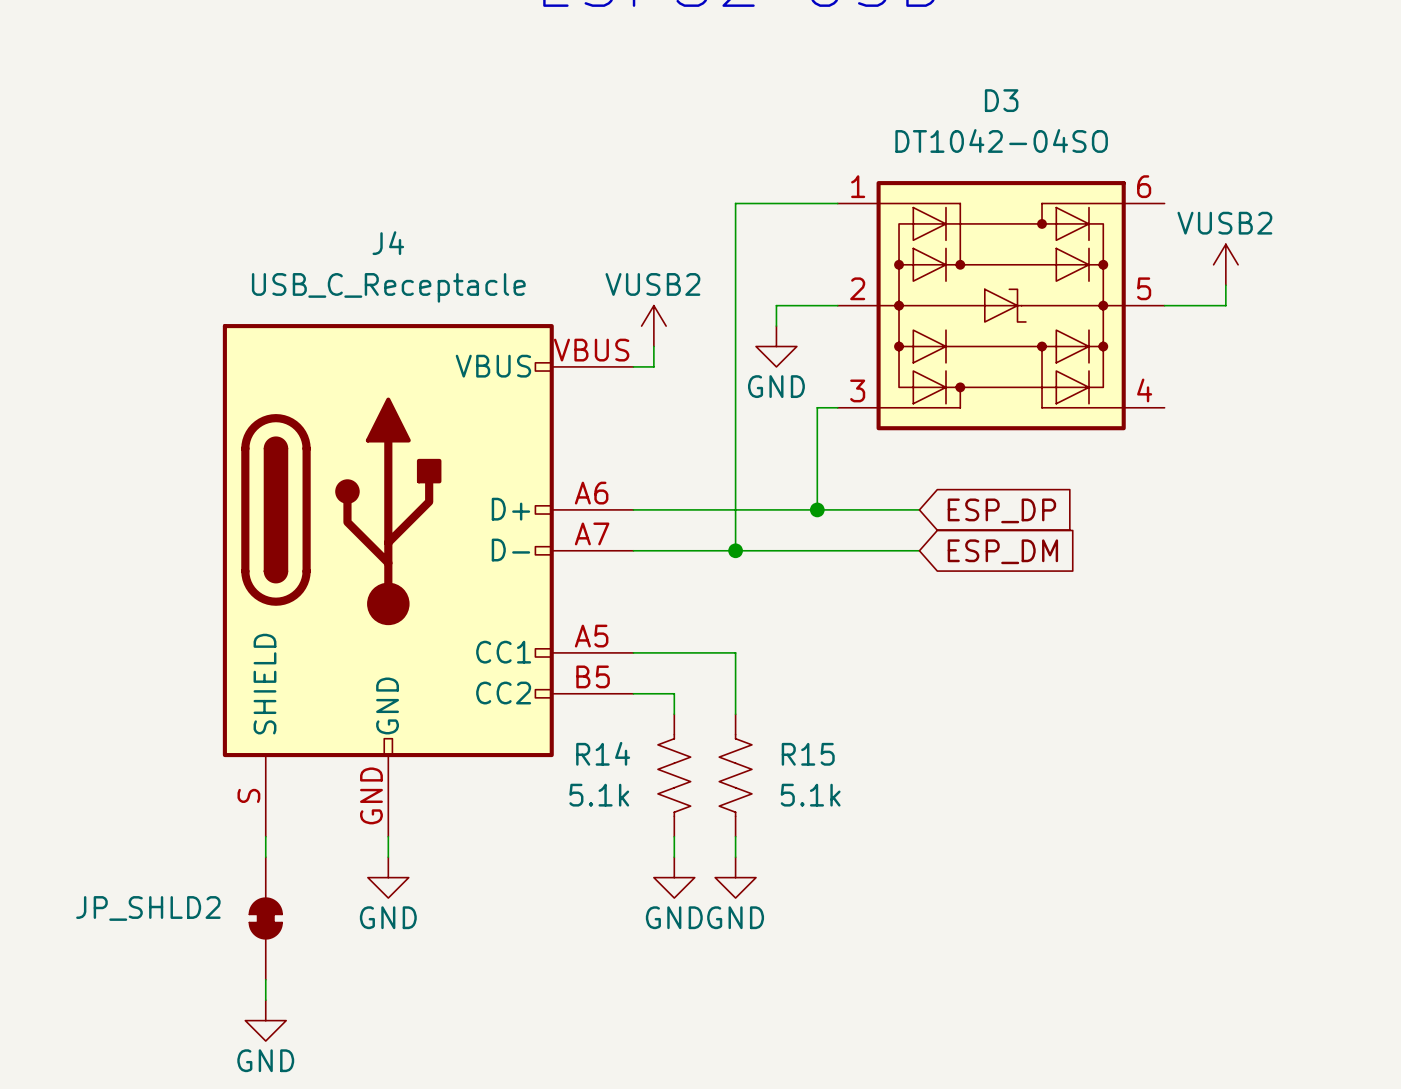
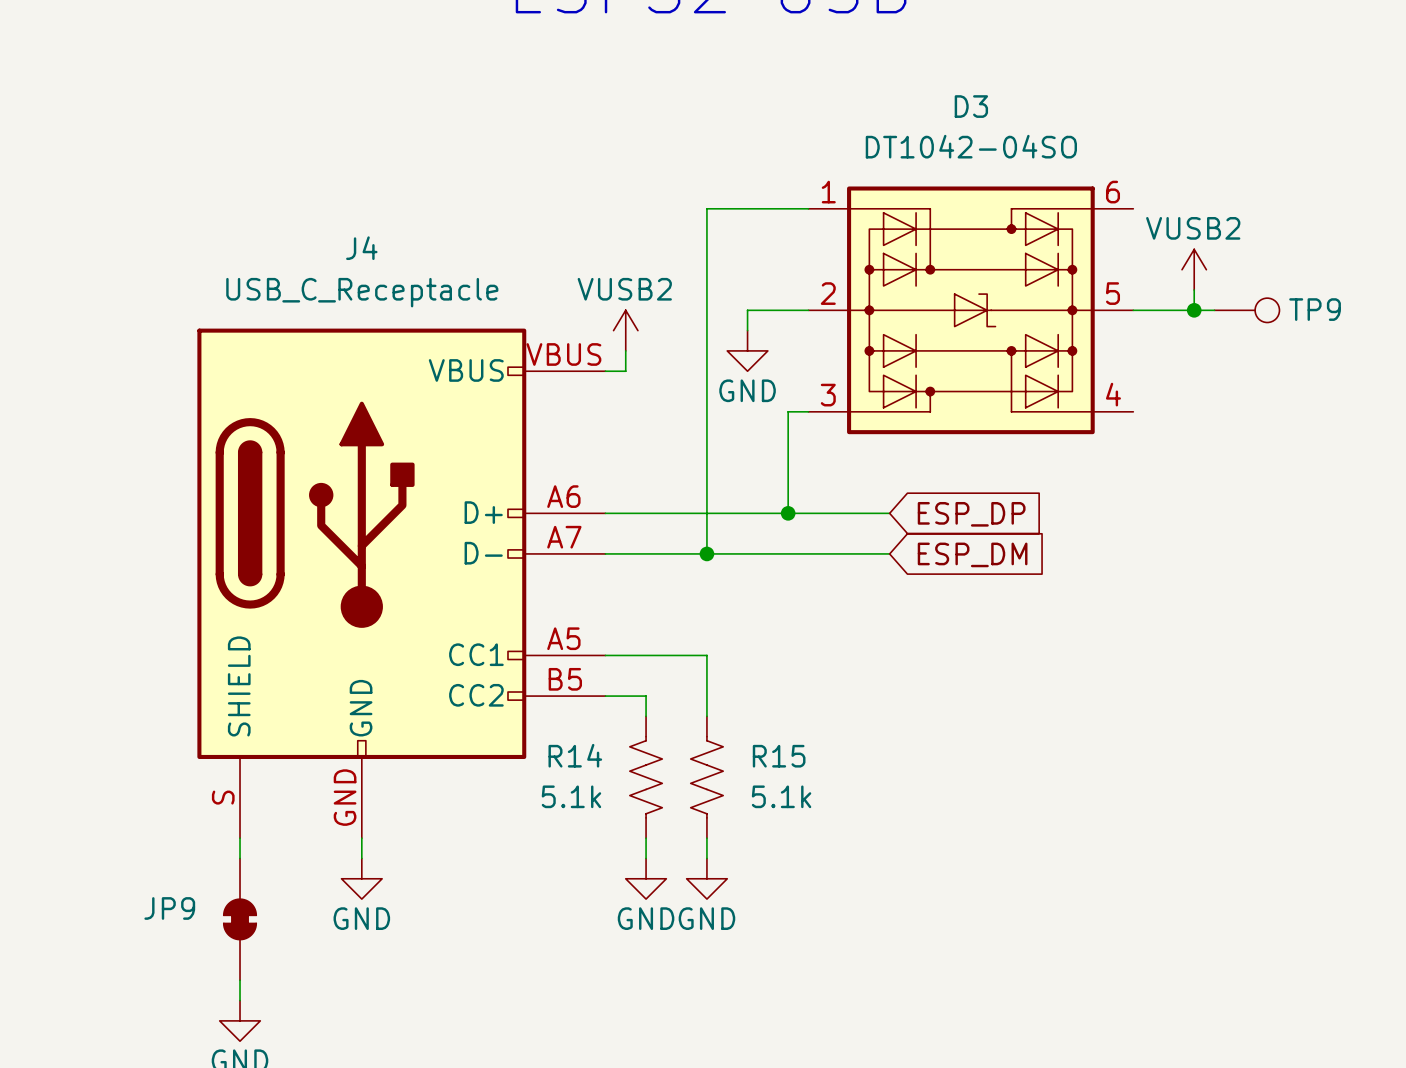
wire: none -> (1194, 310) (1214, 310)
junction: none -> (1194, 310)
TP9: none -> (1246, 310)
JP_SHLD2 name: JP_SHLD2 (148, 908) -> JP9 (169, 908)

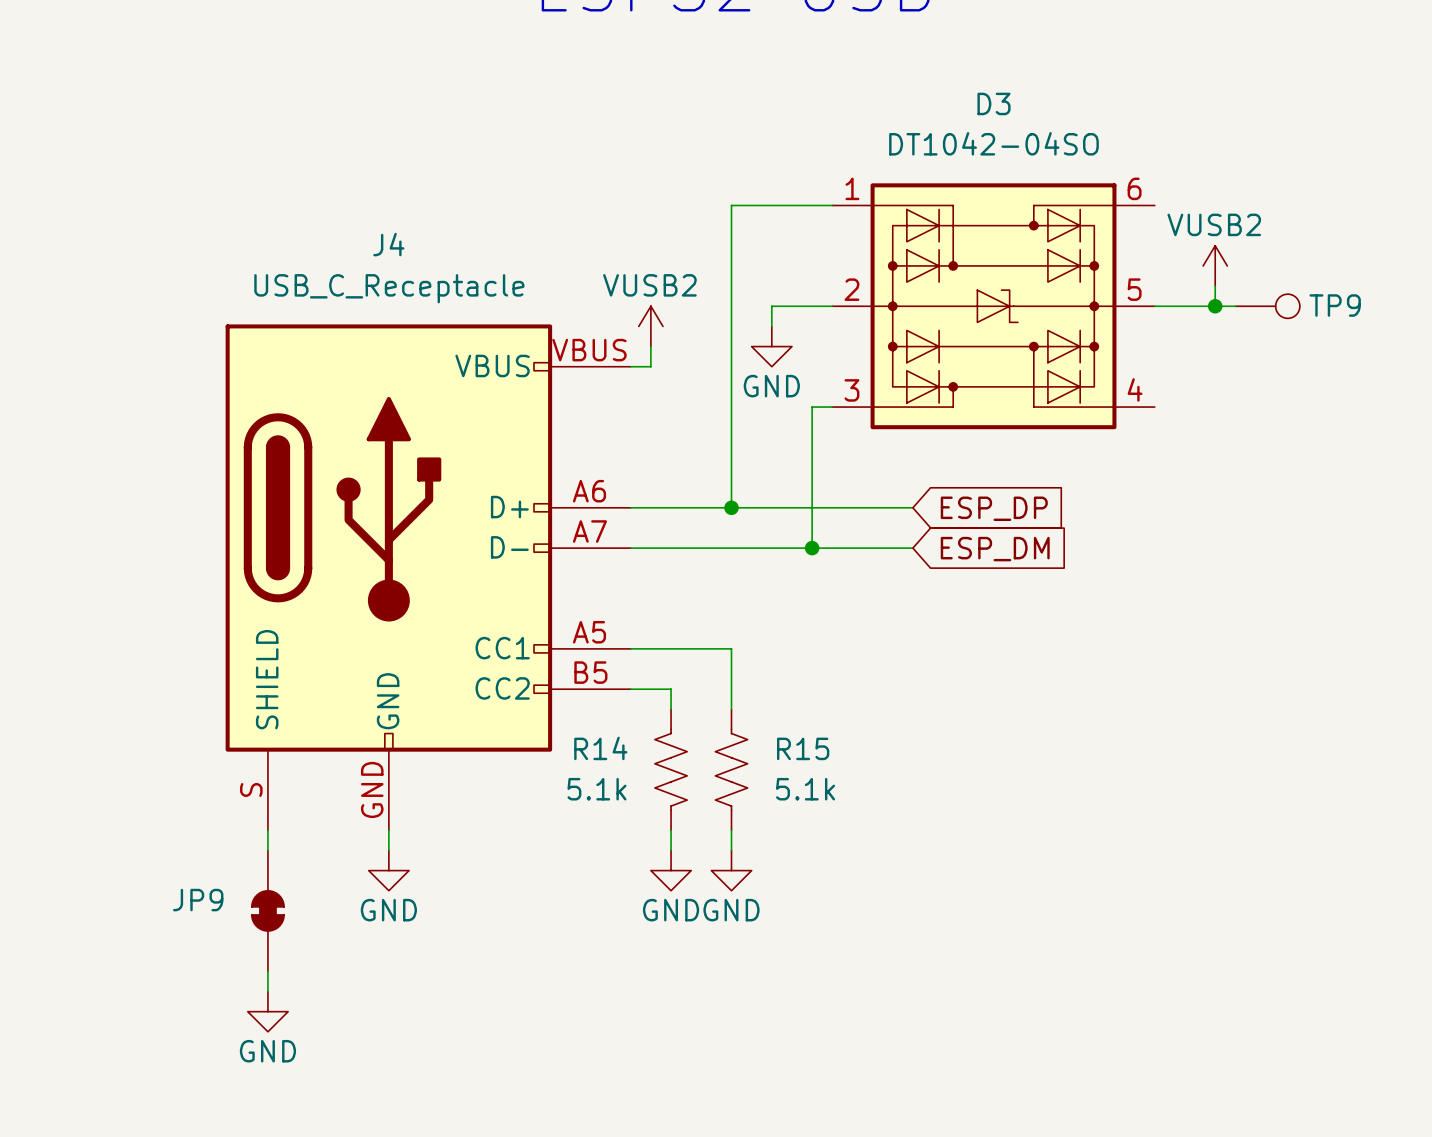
wire: (706, 513) (706, 553) -> (812, 507) (812, 548)
junction: none -> (731, 507)
junction: (788, 513) -> none
junction: (706, 553) -> none
junction: none -> (812, 548)

